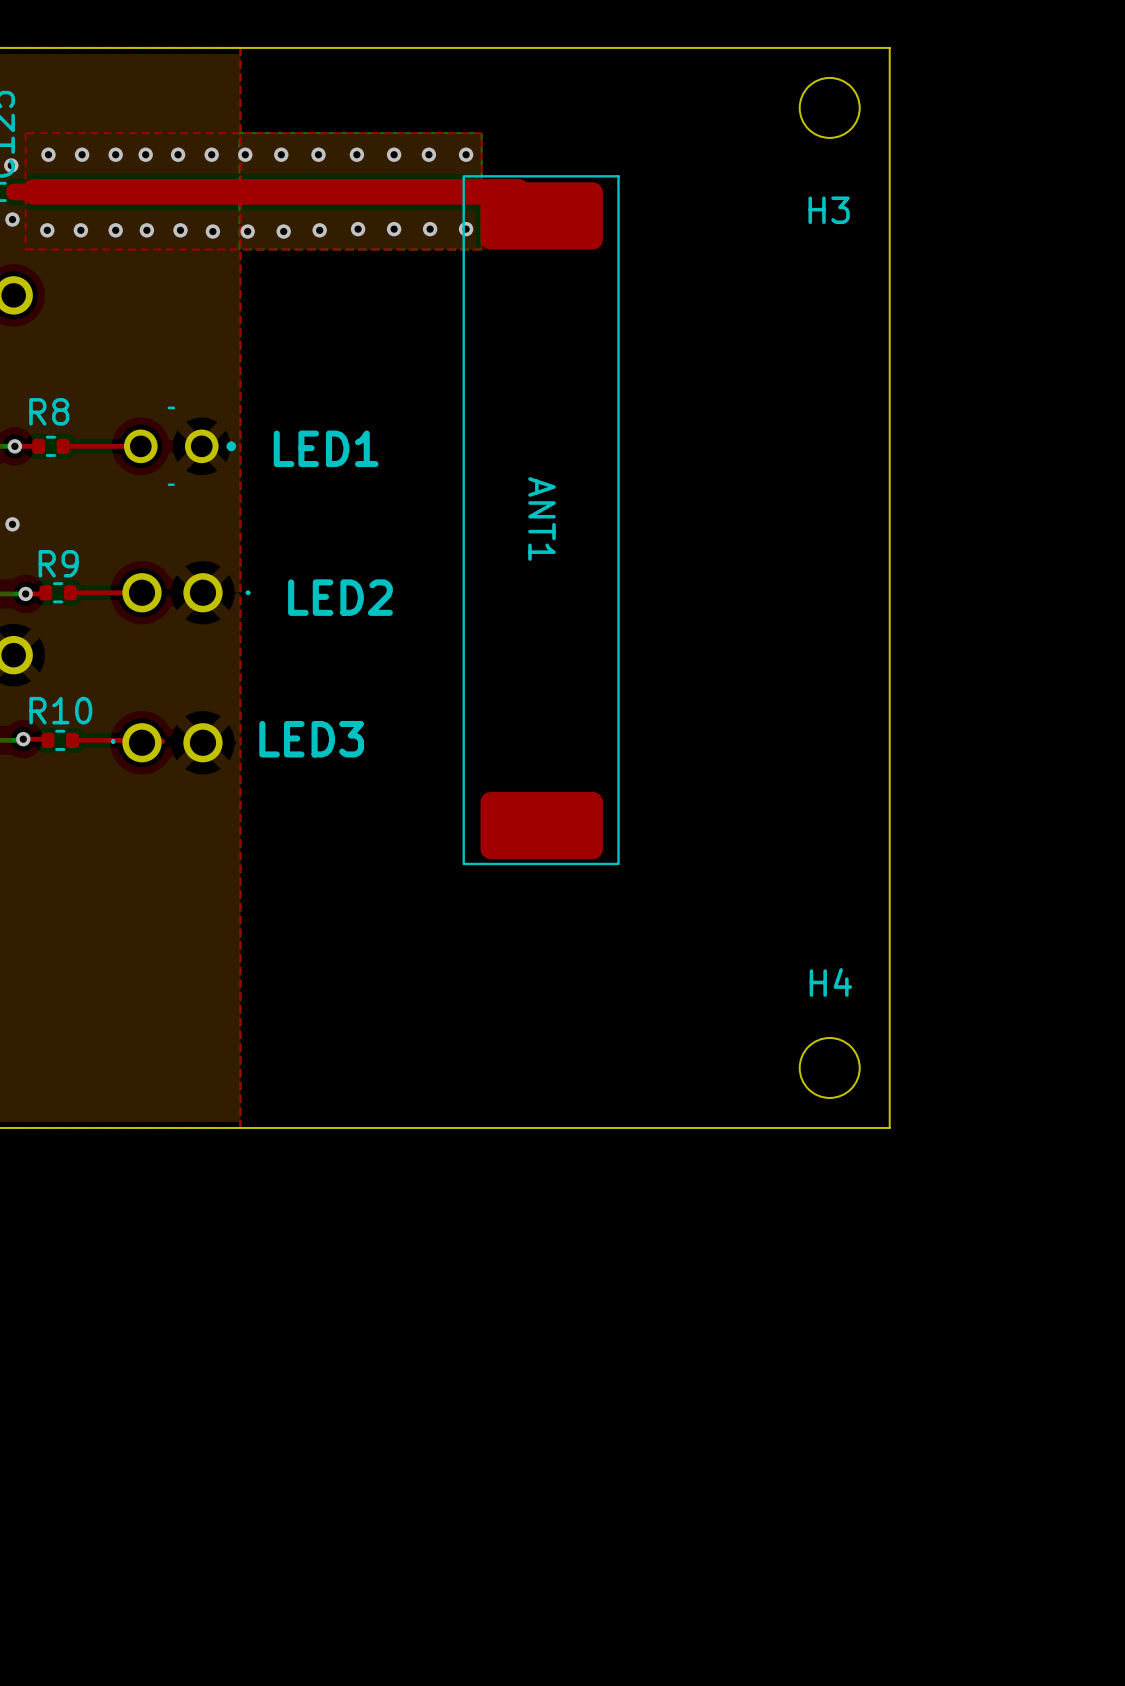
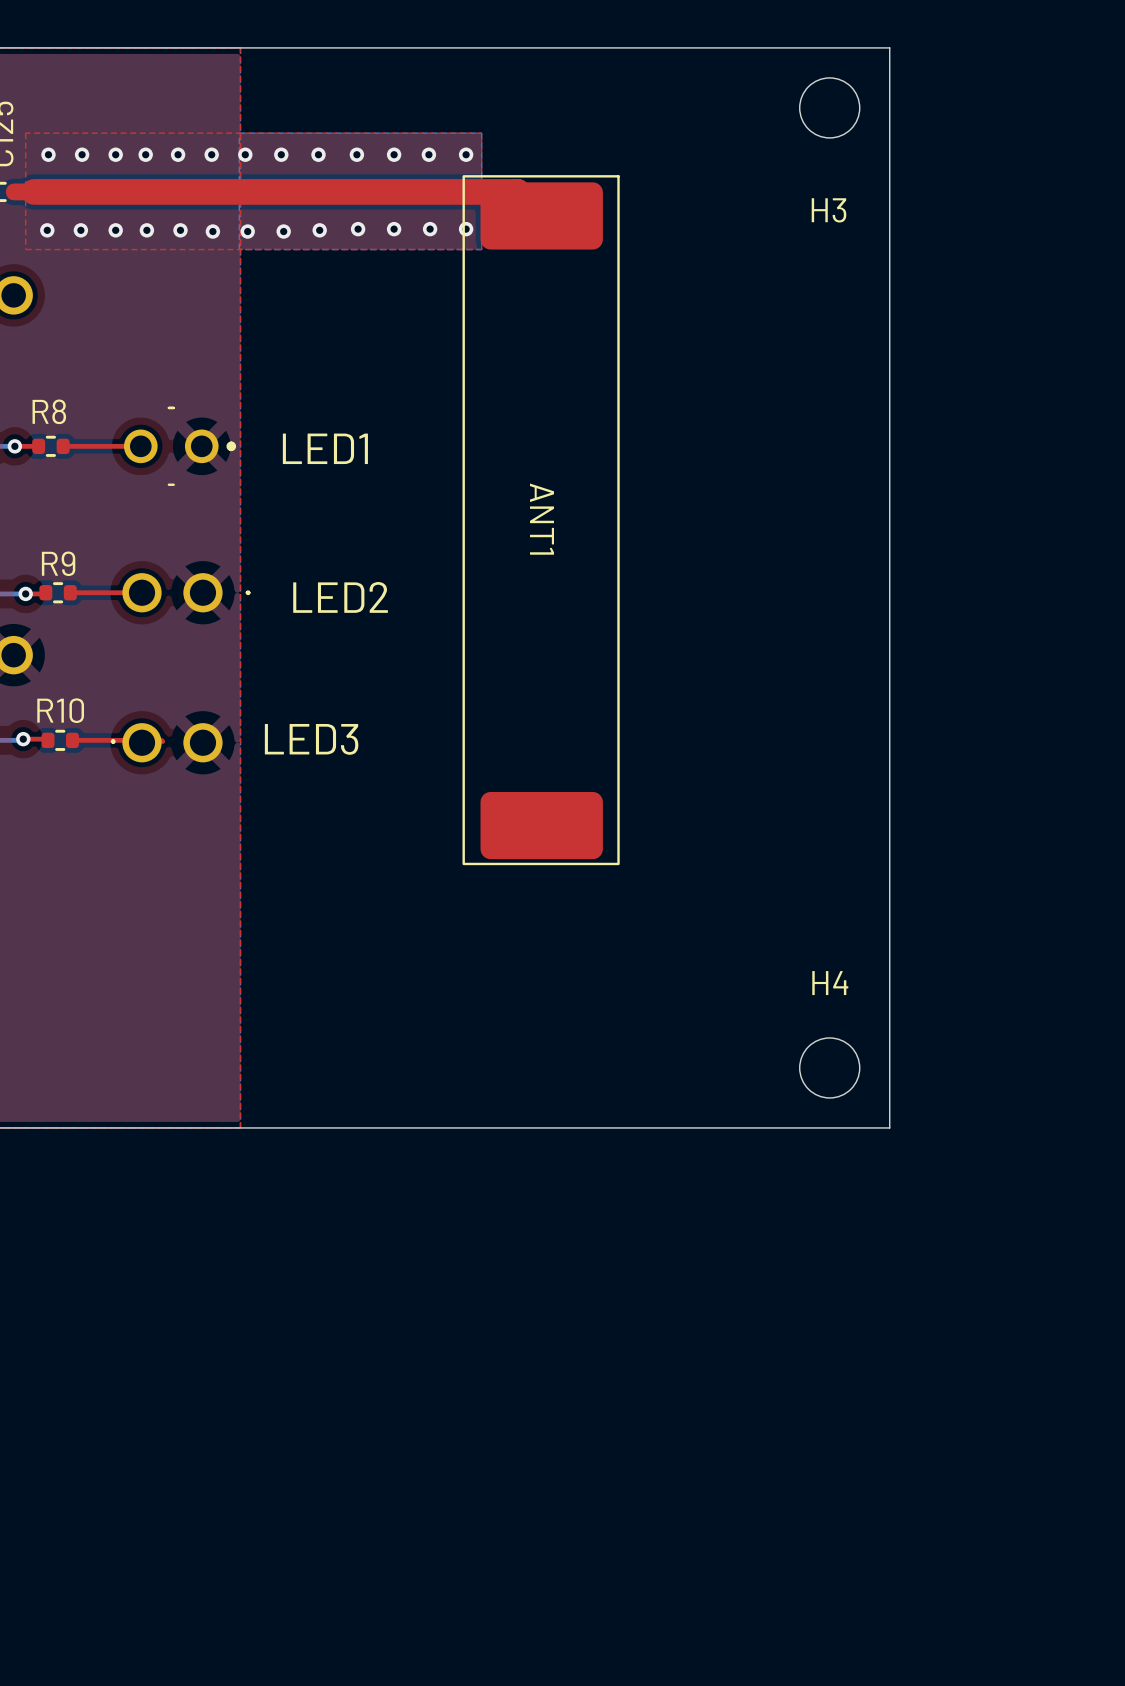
via: (11, 165) -> none
via: (12, 219) -> none
via: (12, 524) -> none

